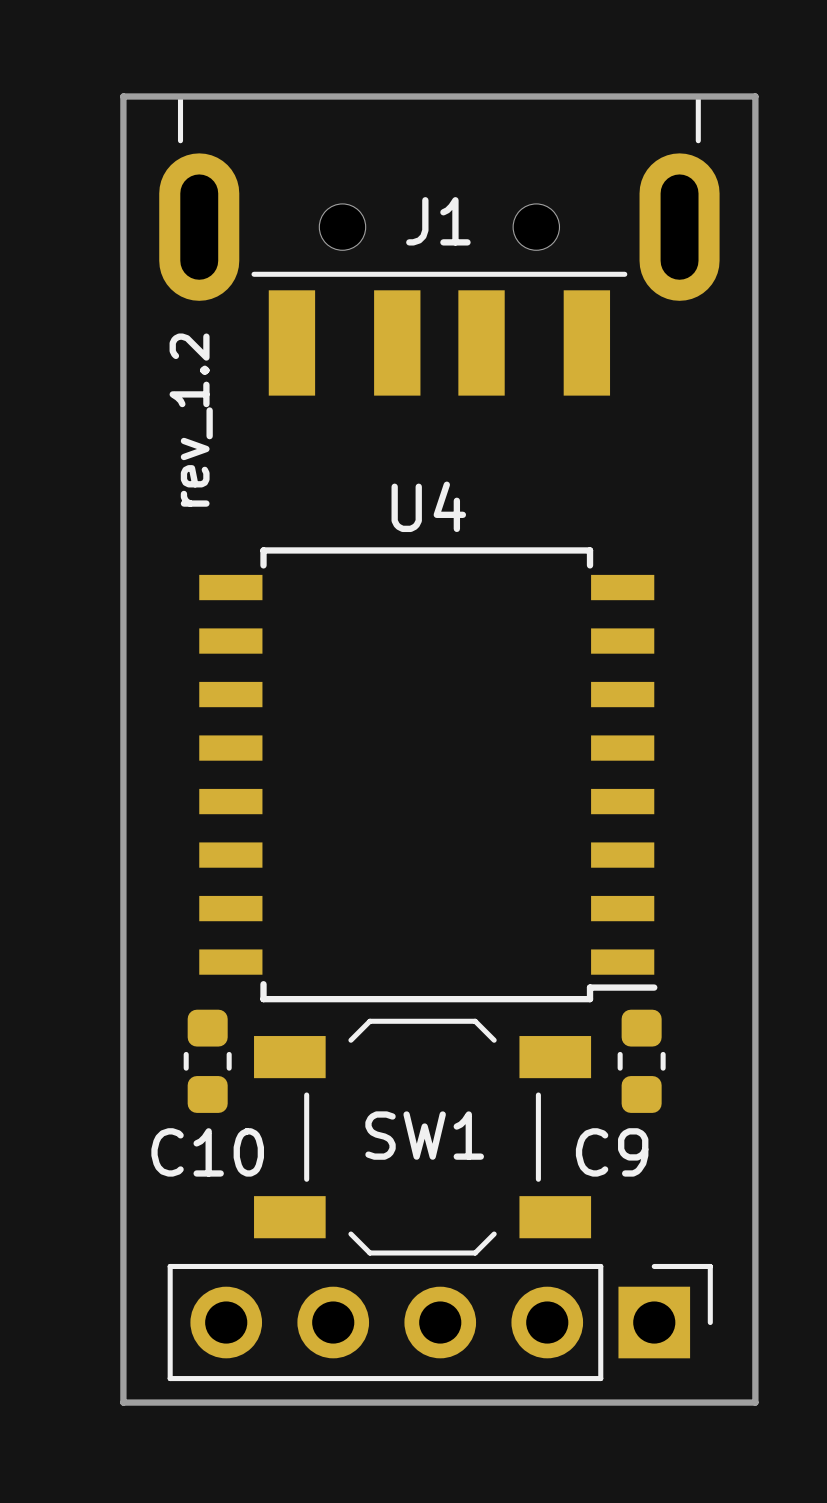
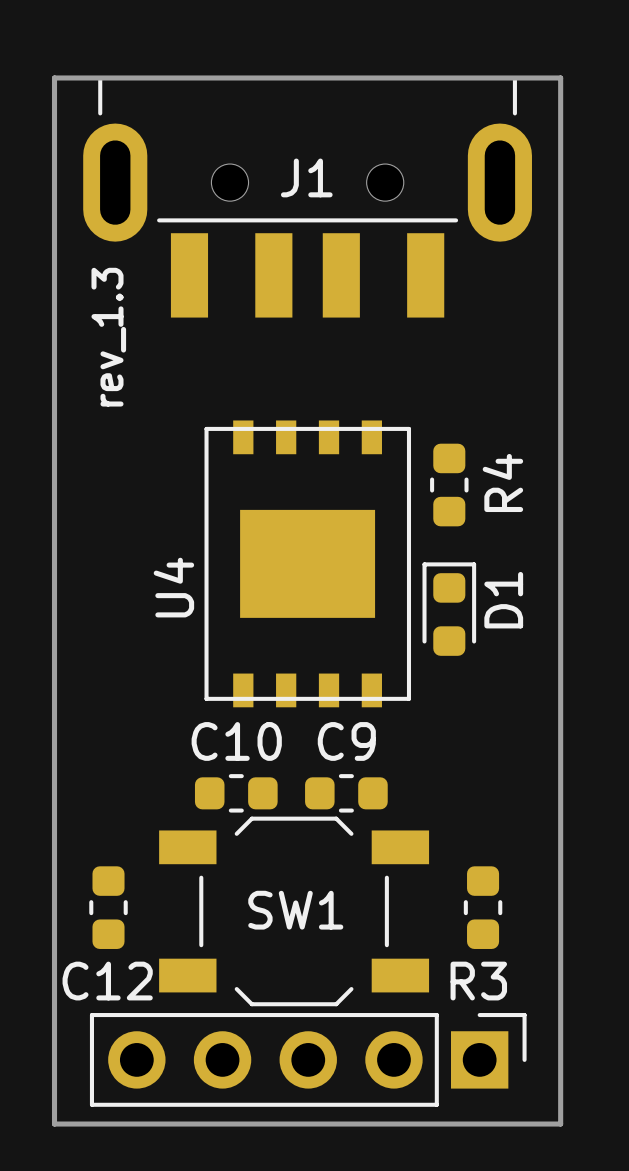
text: rev_1.2 (191, 420) -> rev_1.3 (108, 337)
U4 name position: U4 (428, 506) -> U4 (173, 587)
U4 footprint: [199, 547, 658, 1003] -> [204, 420, 412, 708]
R4: none -> (449, 485)
D1: none -> (449, 609)
C10 rotation: 0° (207, 1061) -> 90° clockwise (236, 793)
C10 position: (207, 1061) -> (236, 793)
C9 rotation: 0° (641, 1061) -> 90° clockwise (346, 793)
C9 position: (641, 1061) -> (346, 793)
C12: none -> (108, 907)
R3: none -> (483, 907)
C10 name position: C10 (207, 1152) -> C10 (236, 741)
C9 name position: C9 (612, 1152) -> C9 (346, 741)

